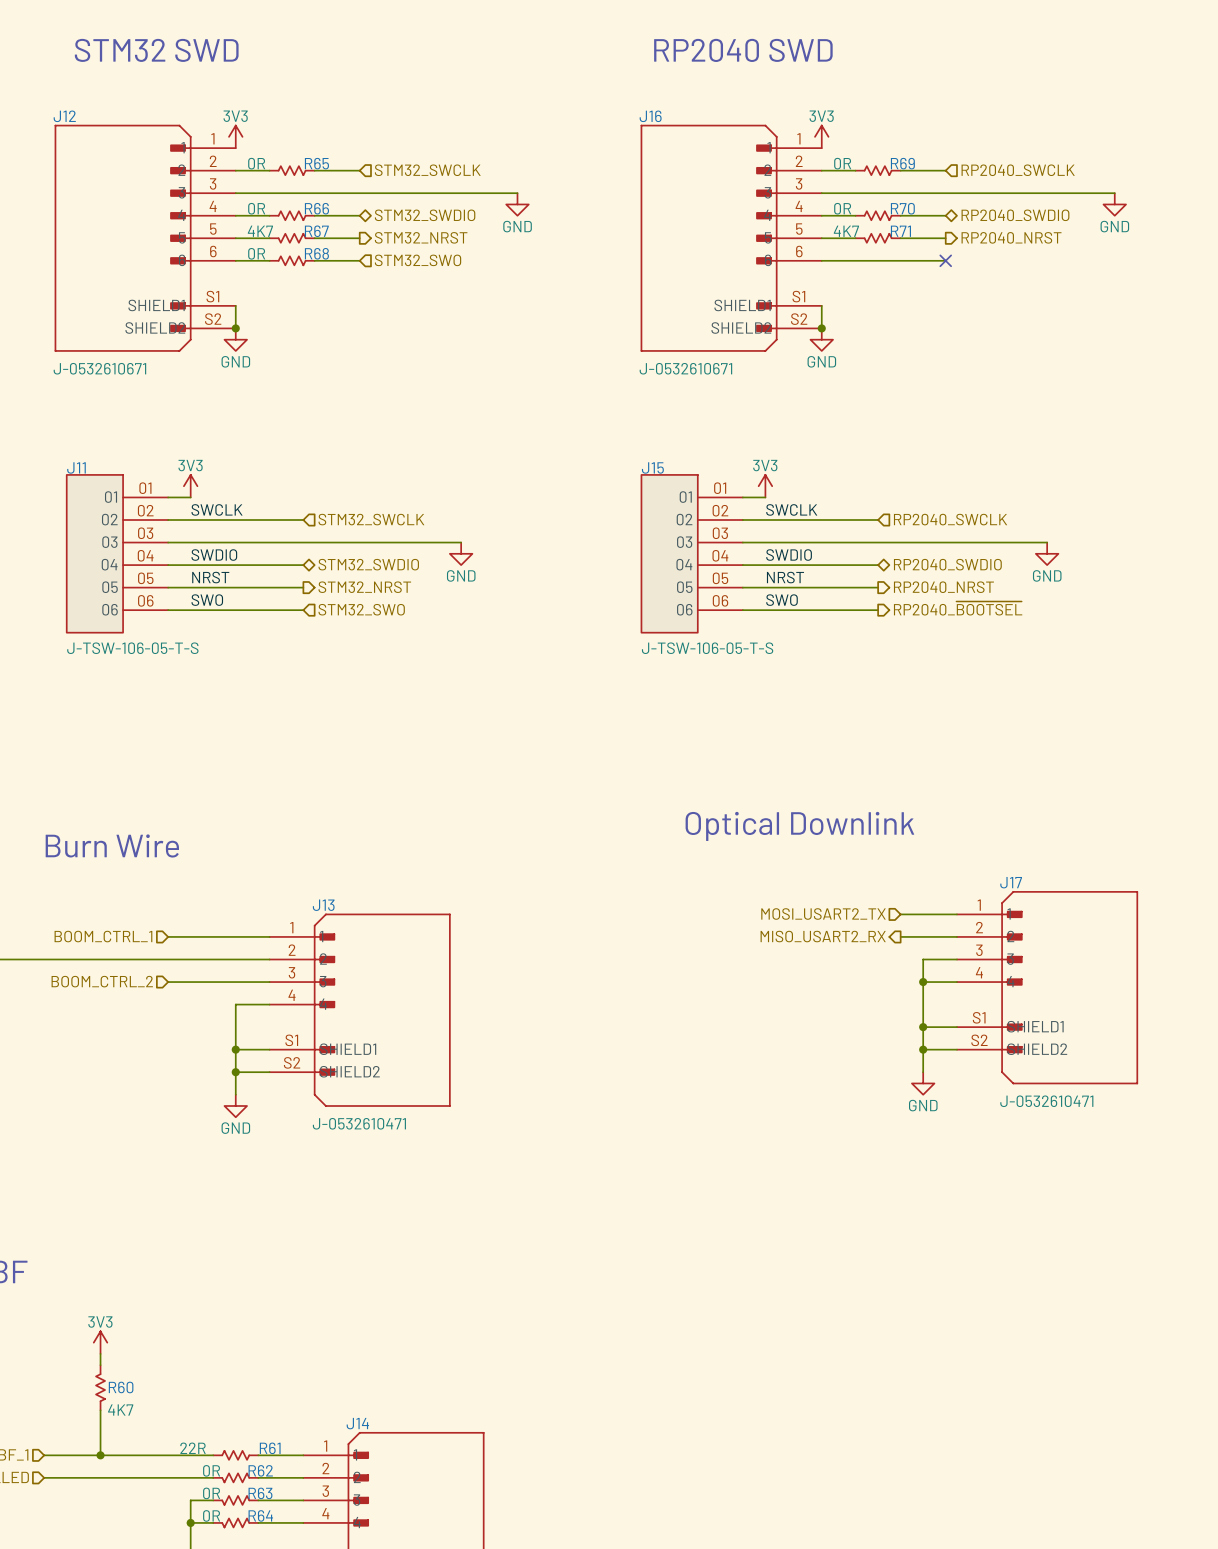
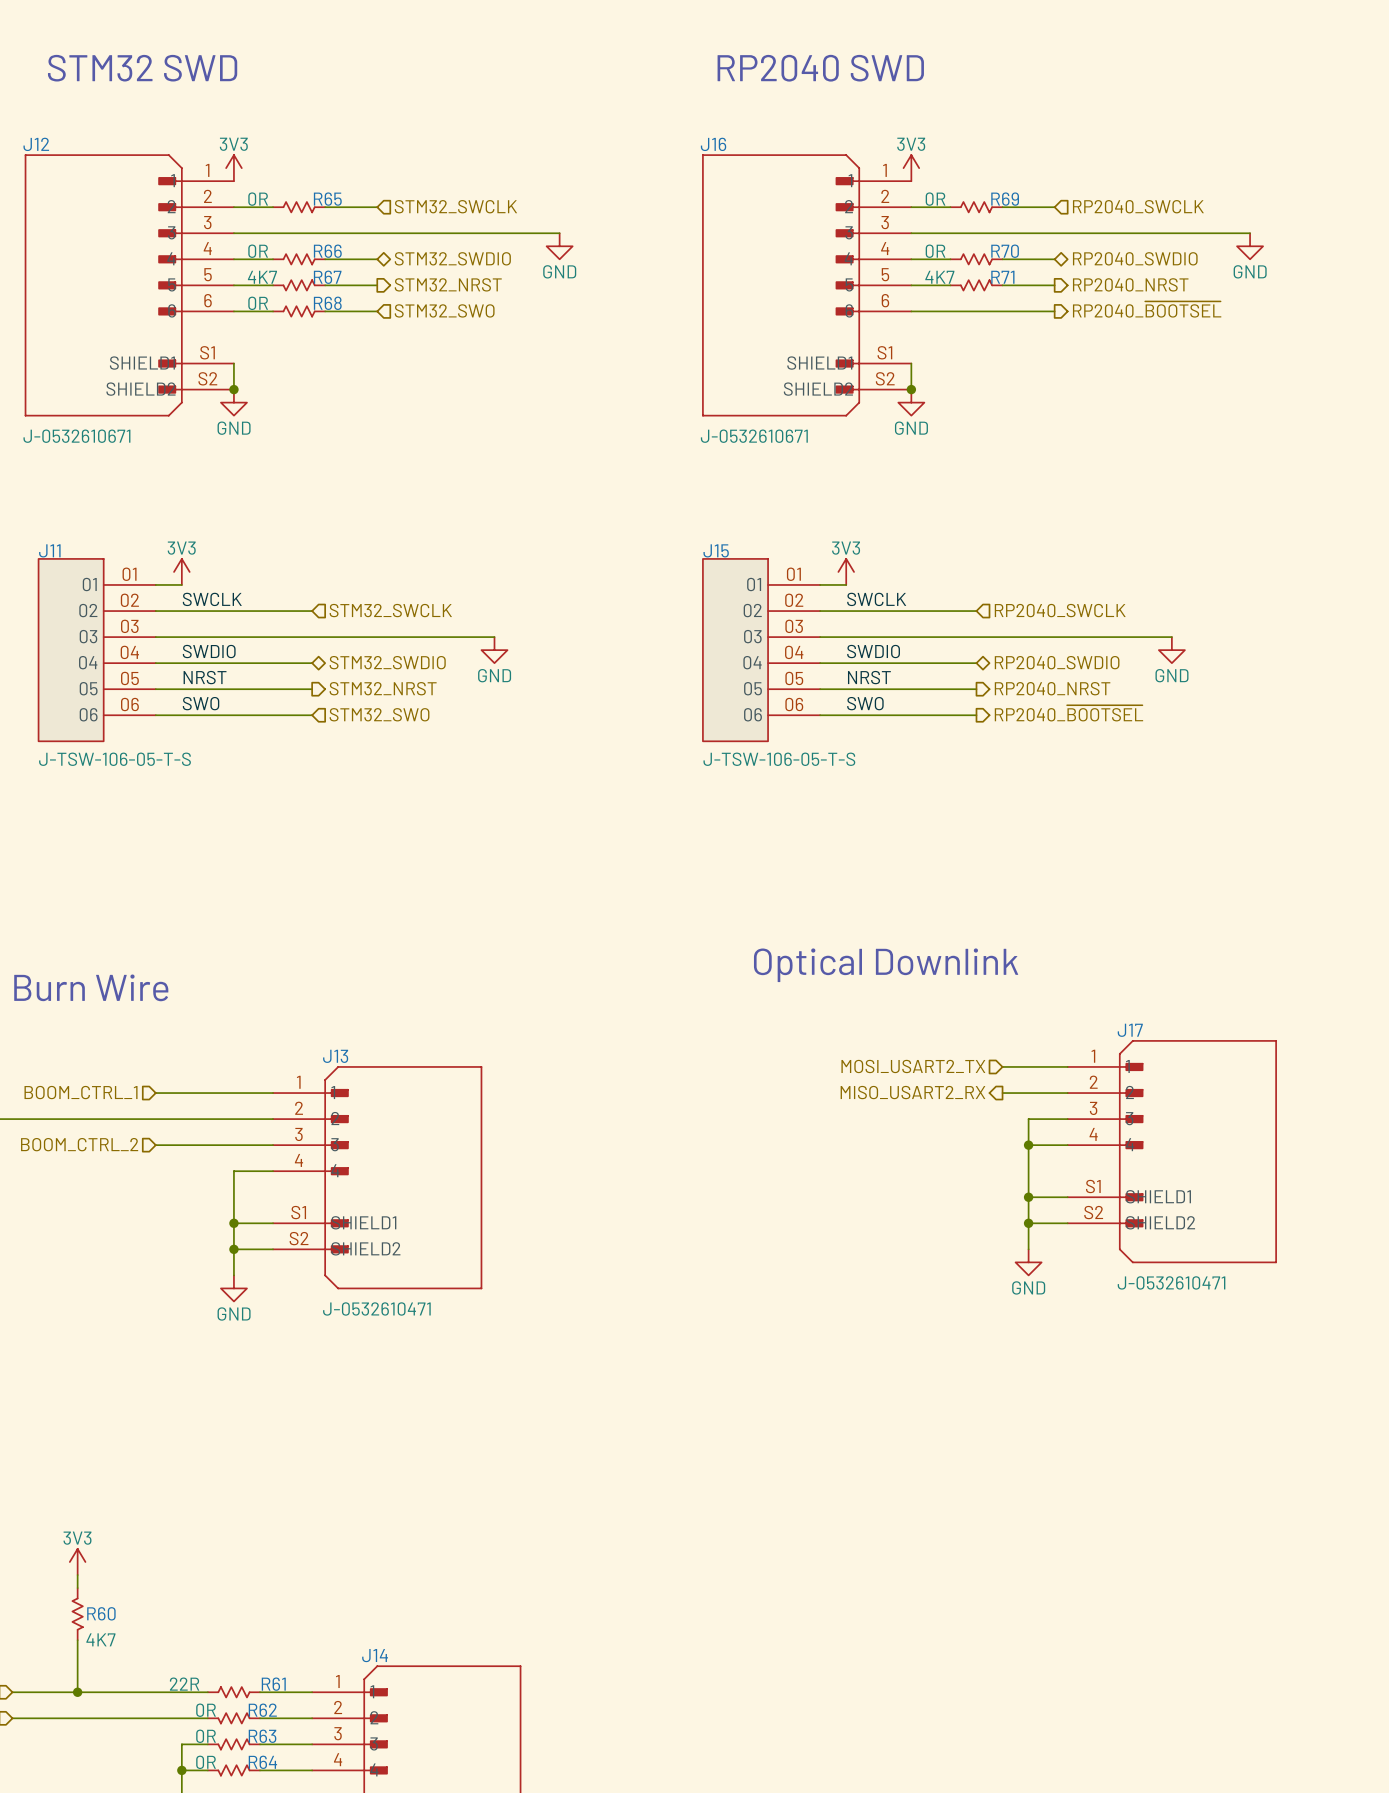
hierarchical label: none -> RP2040_~{BOOTSEL} (1147, 309)
no-connect mark: (945, 260) -> none

